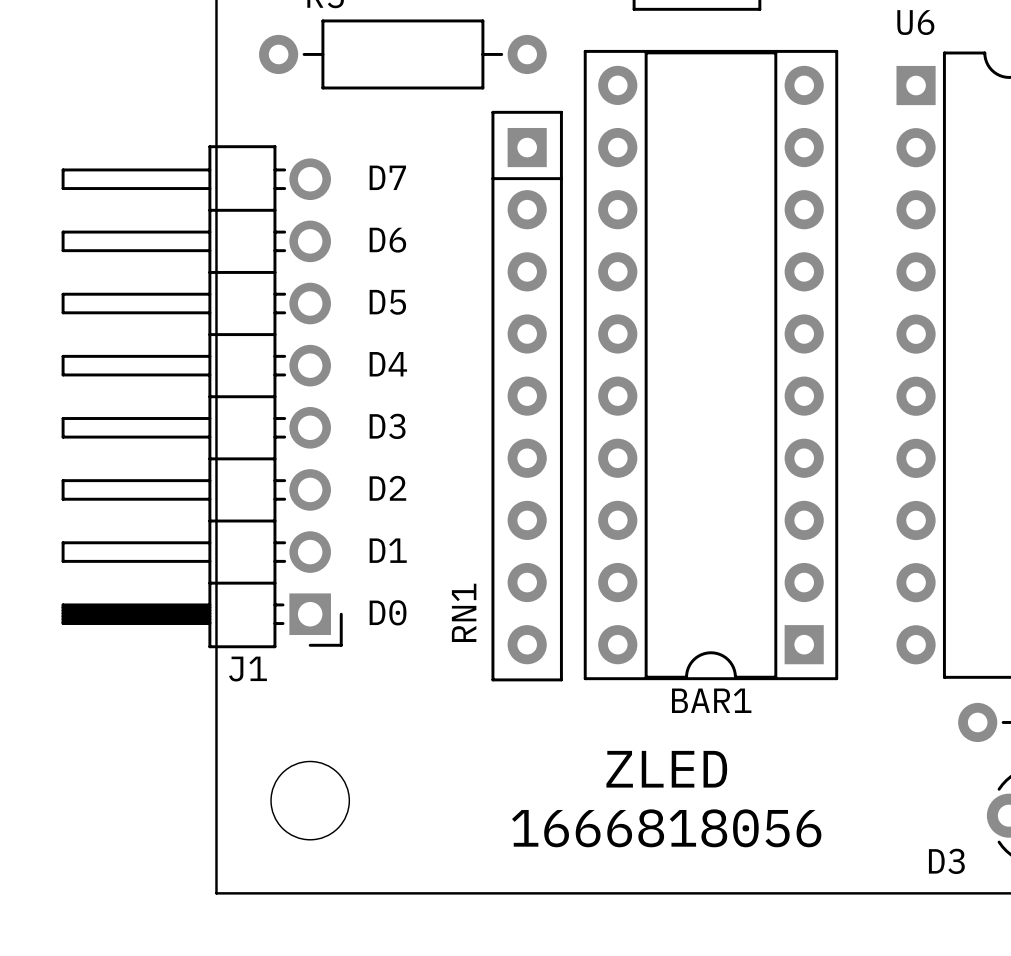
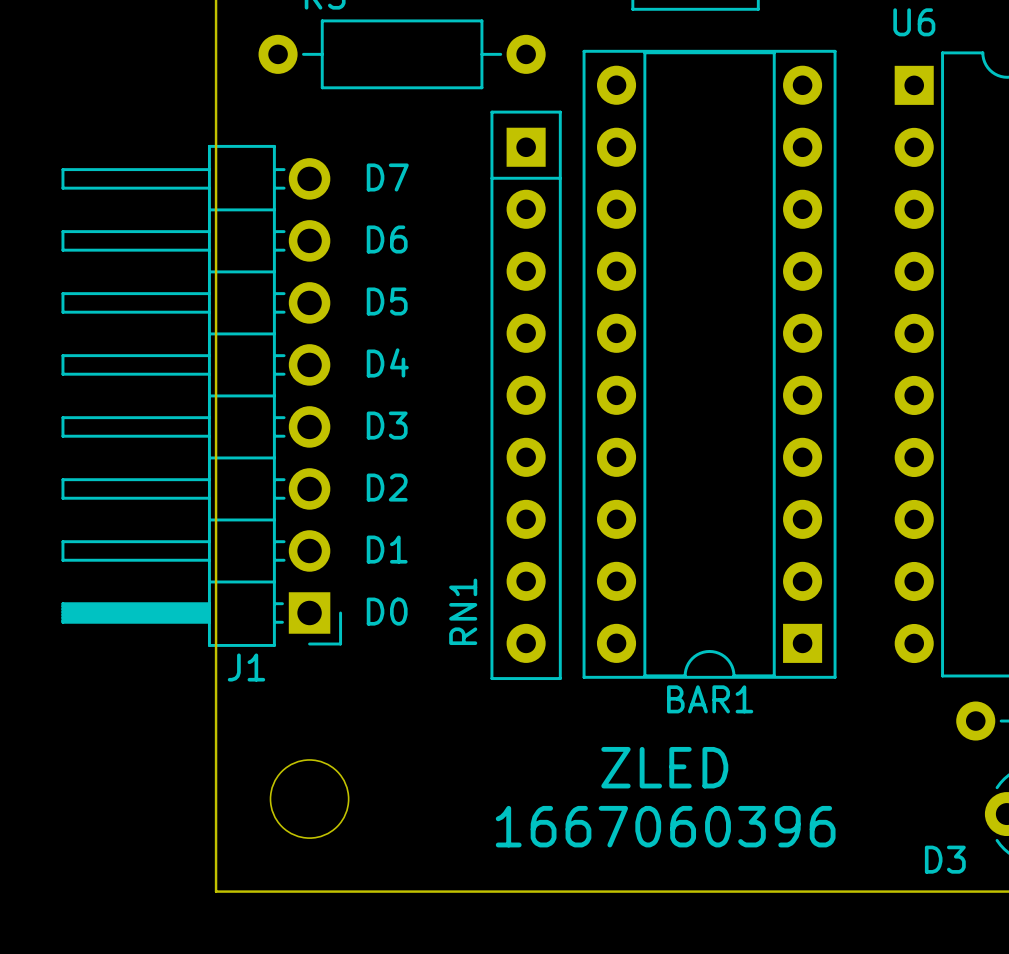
text: 1666818056 (666, 828) -> 1667060396 (665, 826)

